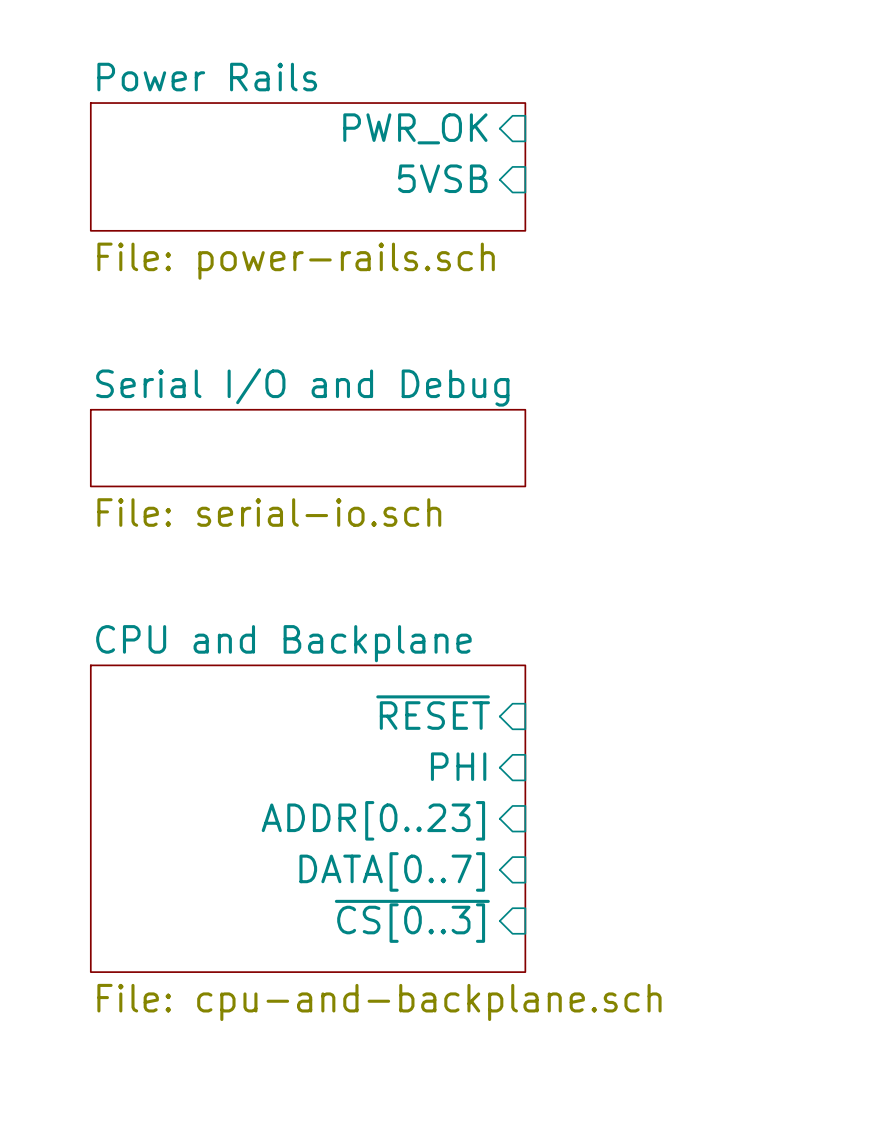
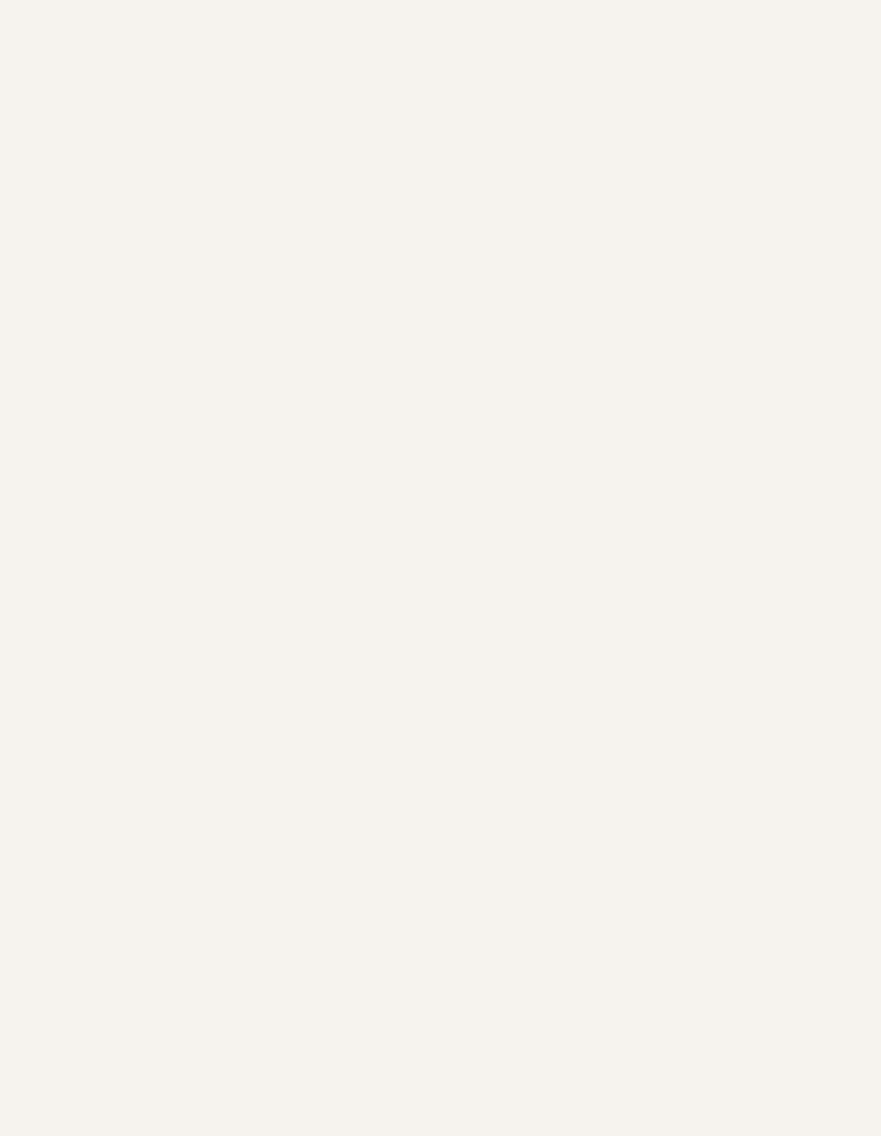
sheet pin: PWR_OK (415, 128) -> none
sheet Power Rails: File: power-rails.sch (308, 166) -> none
sheet pin: 5VSB (442, 178) -> none
sheet Serial I/O and Debug: File: serial-io.sch (308, 448) -> none
sheet pin: ~{RESET} (433, 712) -> none
sheet pin: PHI (458, 766) -> none
sheet CPU and Backplane: File: cpu-and-backplane.sch (308, 818) -> none
sheet pin: ADDR[0..23] (373, 820) -> none
sheet pin: DATA[0..7] (392, 871) -> none
sheet pin: ~{CS[0..3]} (412, 921) -> none

